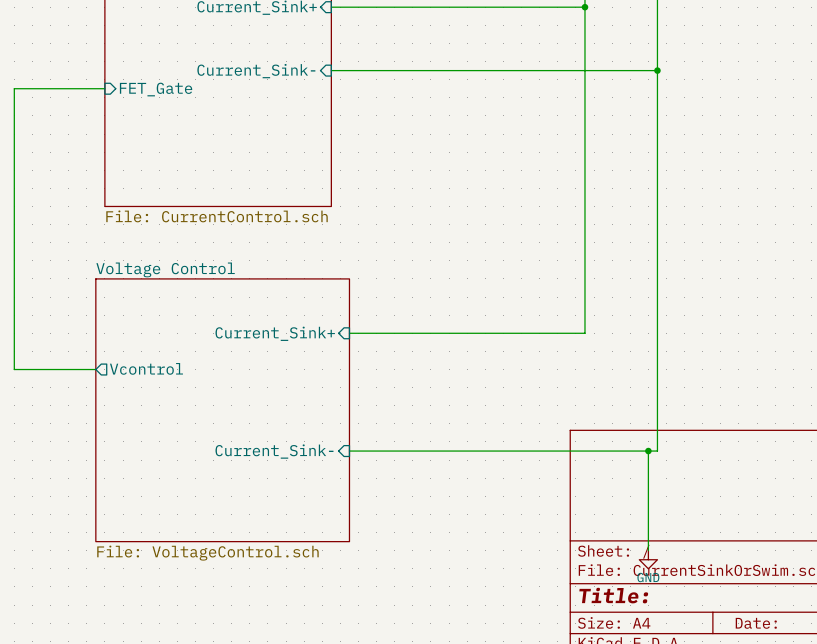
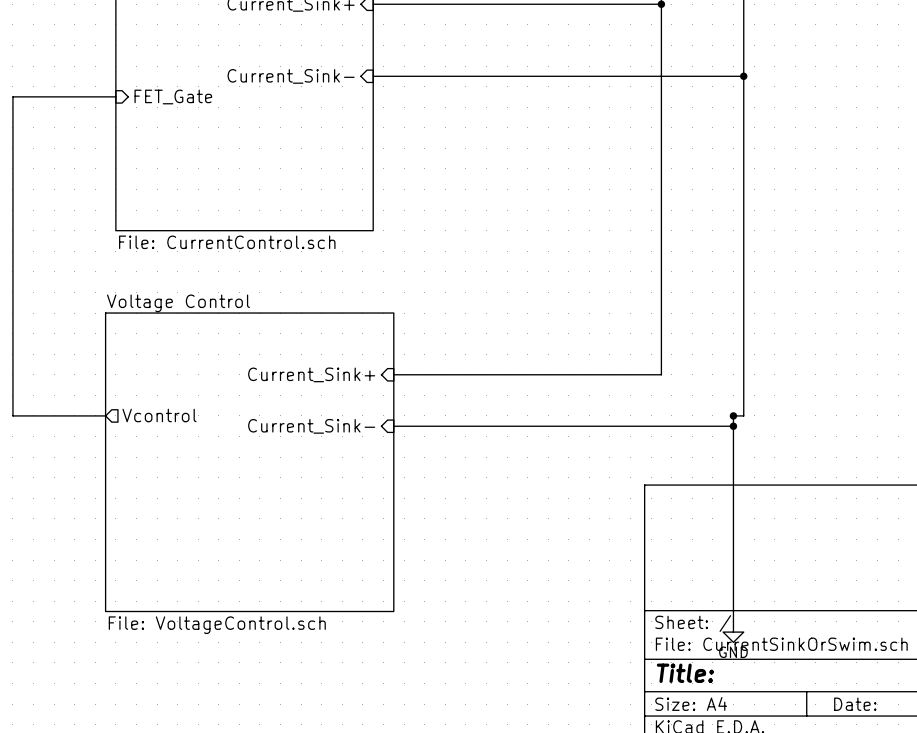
junction: none -> (733, 415)
wire: (657, 369) (657, 451) (349, 451) -> (743, 415) (733, 415) (733, 508)
wire: none -> (393, 426) (733, 426)
junction: none -> (733, 426)
sheet pin position: Current_Sink- (274, 451) -> Current_Sink- (311, 426)
junction: (648, 451) -> none

